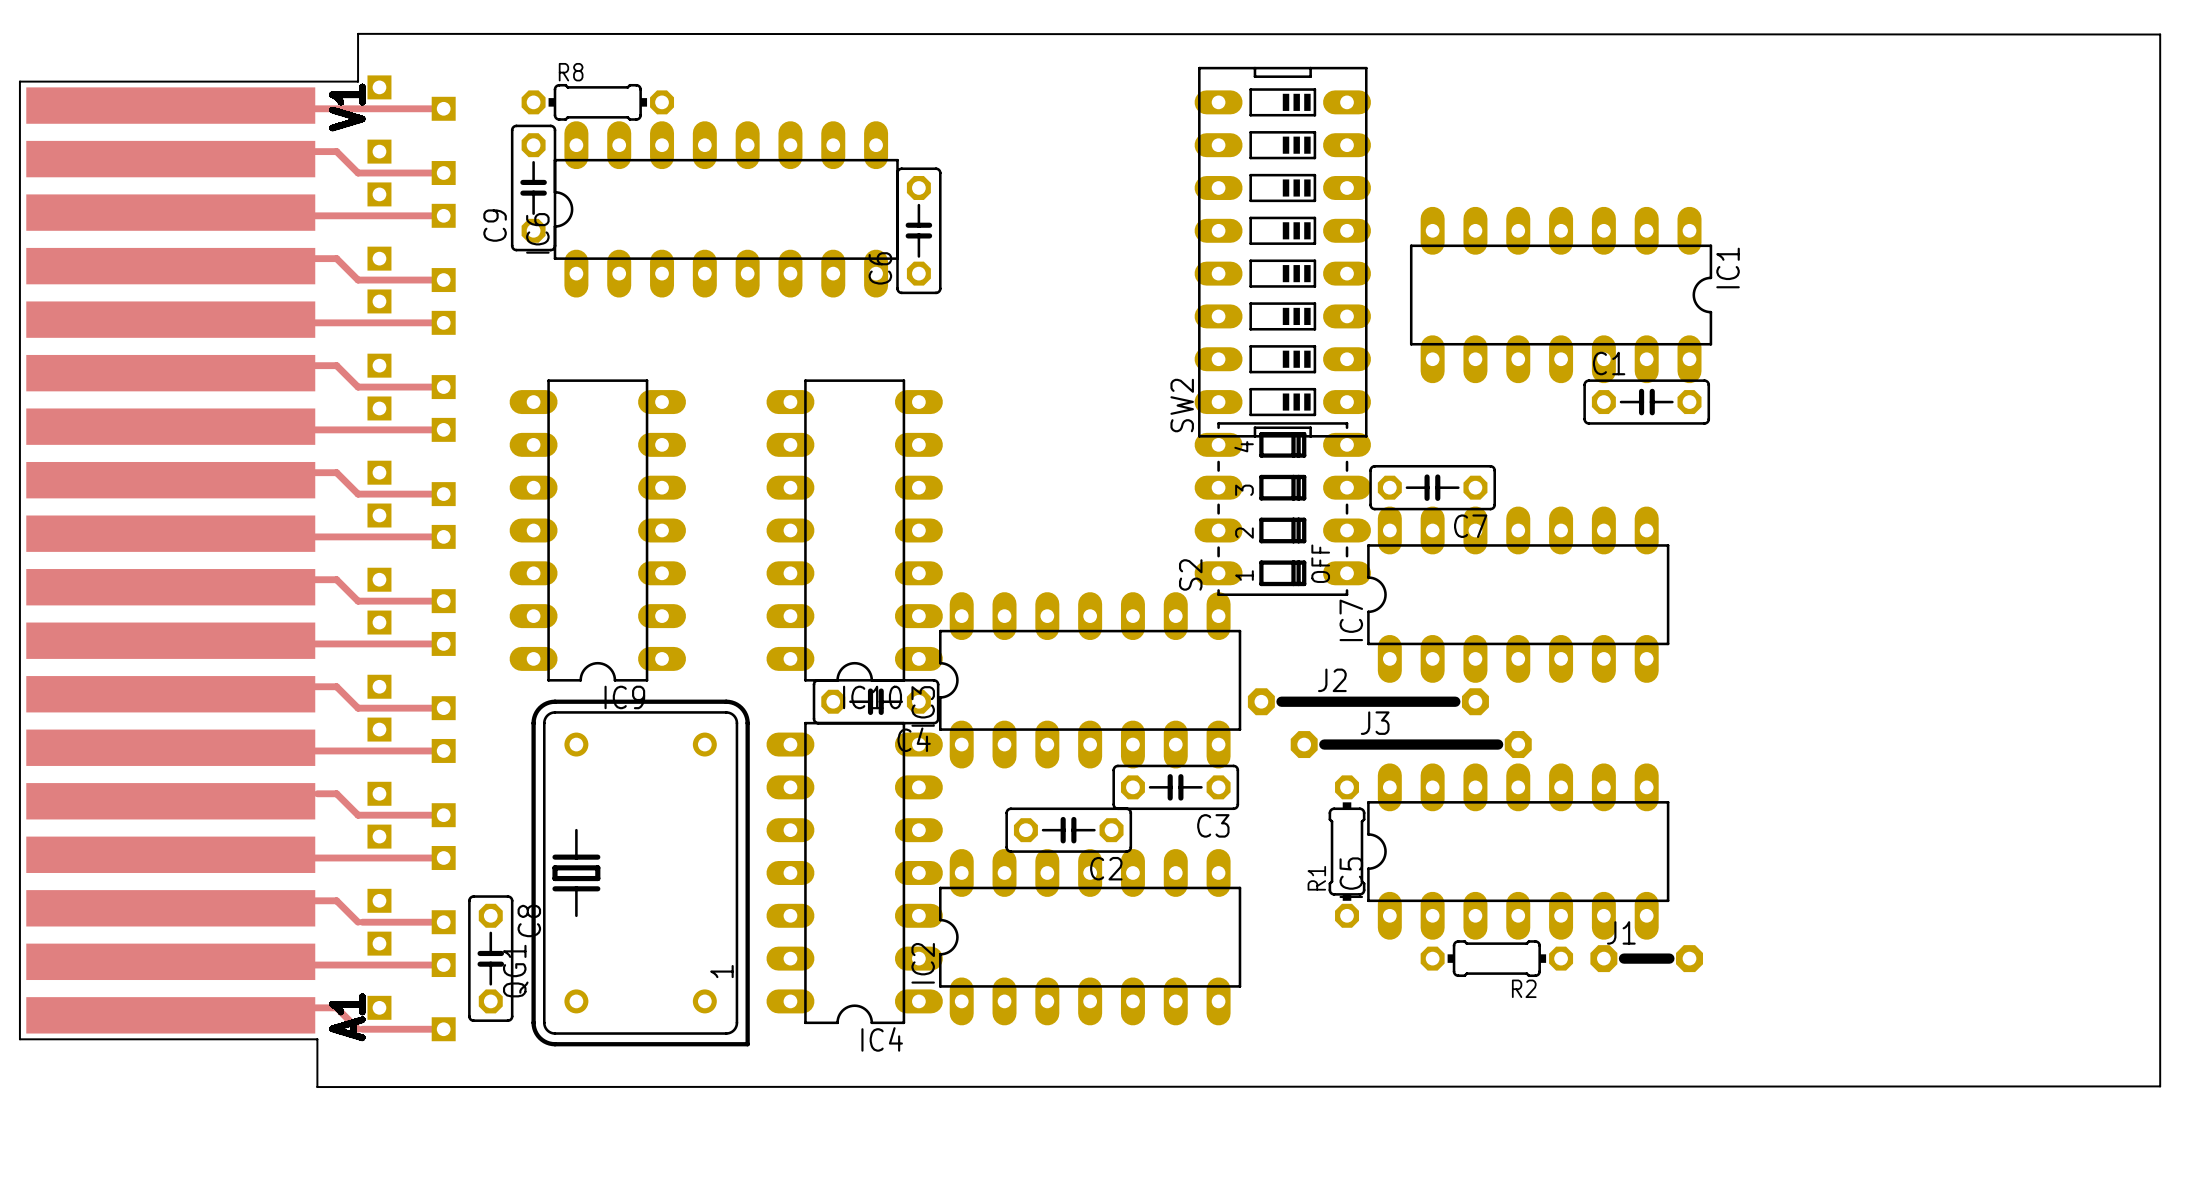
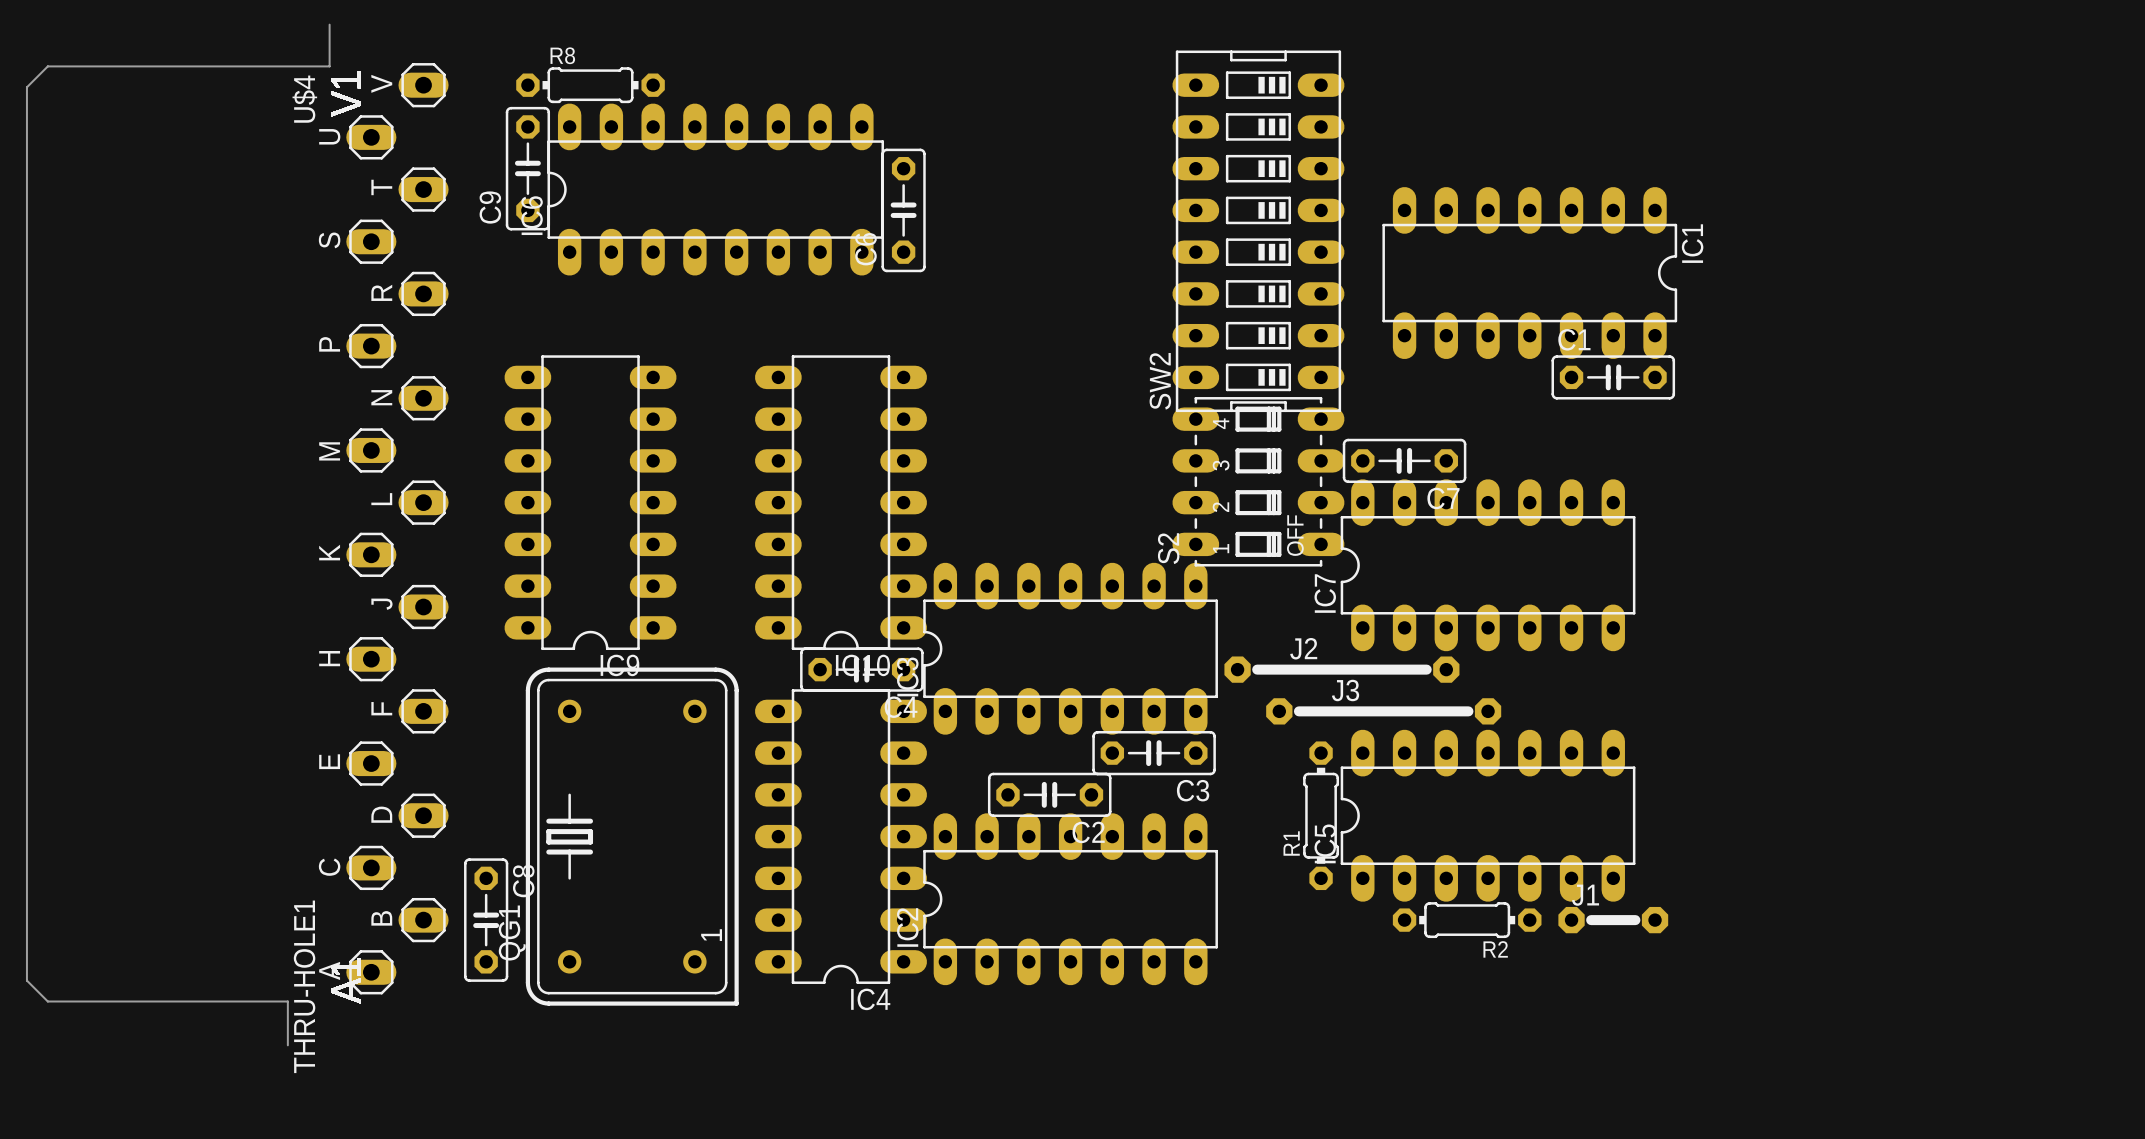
board edge: (358, 33) (2160, 34) (2160, 1086) (317, 1087) (317, 1039) (19, 1039) (19, 81) (358, 81) (358, 33) -> none
U$4: none -> THRU-HOLE1 (397, 528)
part: (240, 558) -> none
part: none -> (178, 534)

